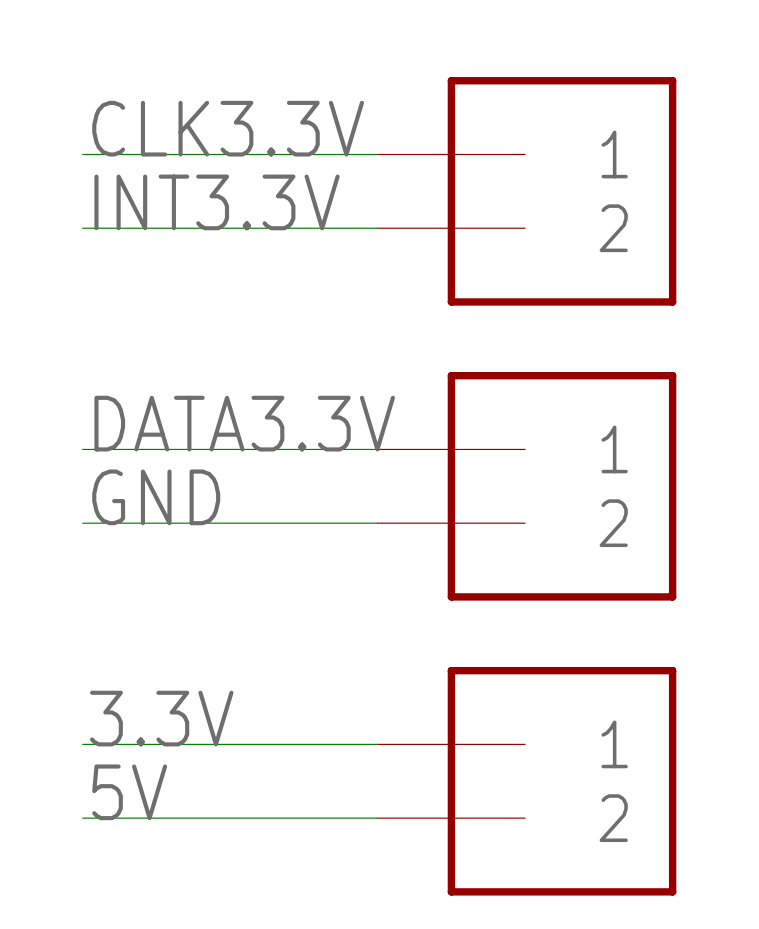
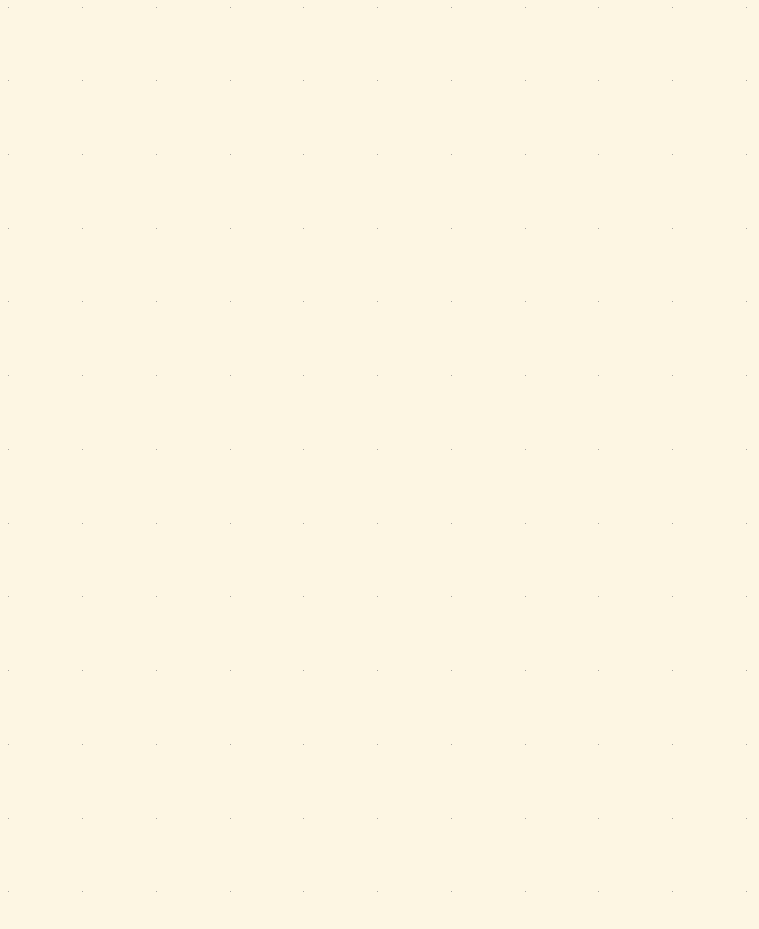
label: CLK3.3V (228, 128) -> none
wire: (82, 154) (377, 154) -> none
part: (526, 191) -> none
label: INT3.3V (217, 202) -> none
wire: (82, 228) (377, 228) -> none
label: DATA3.3V (244, 423) -> none
wire: (82, 449) (377, 449) -> none
part: (526, 486) -> none
label: GND (156, 497) -> none
wire: (82, 523) (377, 523) -> none
label: 3.3V (161, 718) -> none
wire: (82, 744) (377, 744) -> none
part: (526, 781) -> none
label: 5V (129, 792) -> none
wire: (82, 818) (377, 818) -> none

